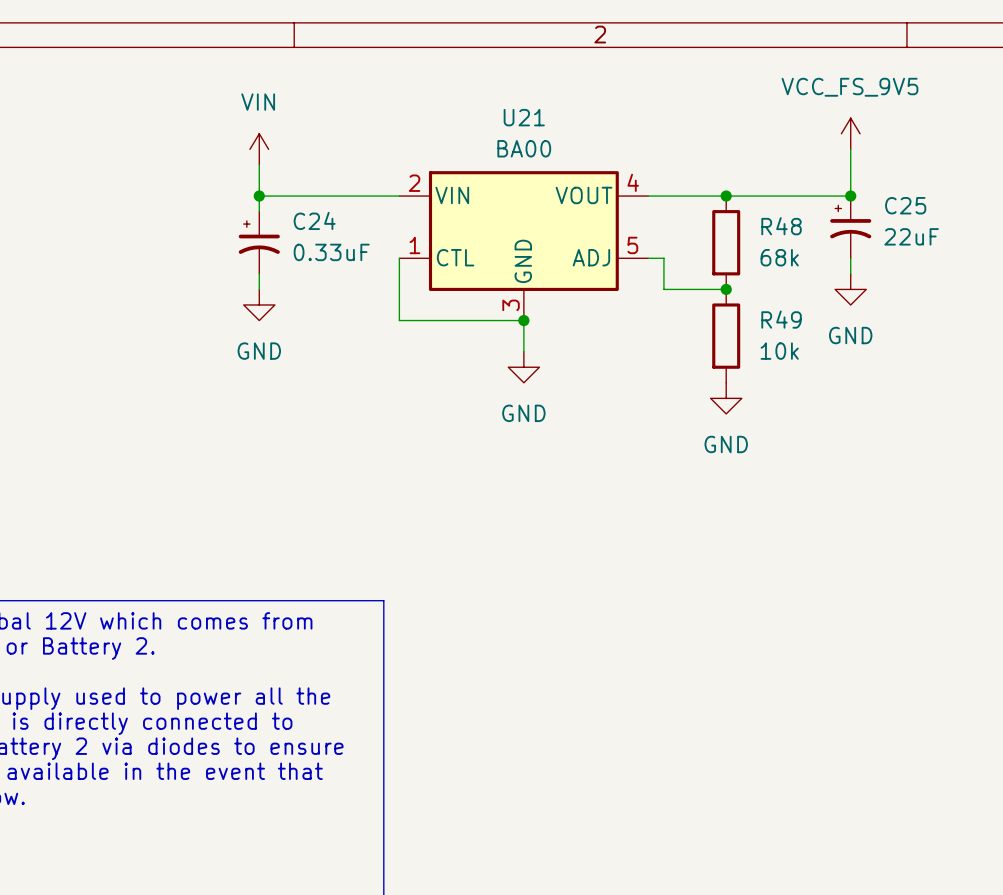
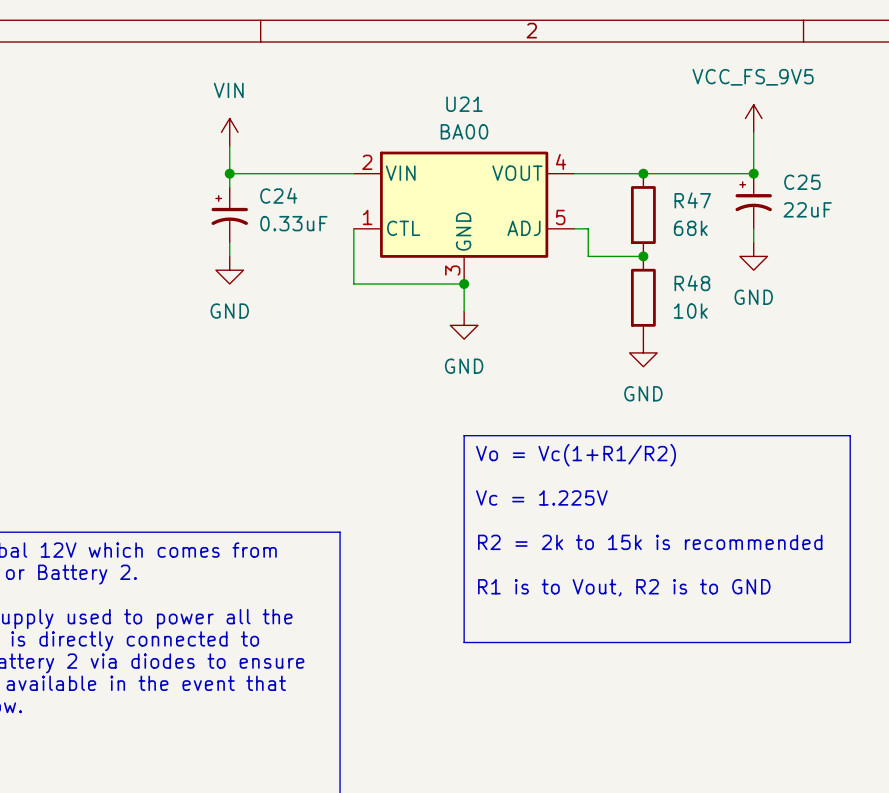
R48 name: R48 (781, 226) -> R47 (692, 200)
R49 name: R49 (781, 319) -> R48 (692, 283)
line: none -> (464, 435) (850, 435) (850, 642) (464, 642) (464, 435)
text: none -> Vo = Vc(1+R1/R2) (576, 455)
text: none -> Vc = 1.225V (541, 497)
text: none -> R2 = 2k to 15k is recommended (650, 542)
text: none -> R1 is to Vout, R2 is to GND (624, 587)

